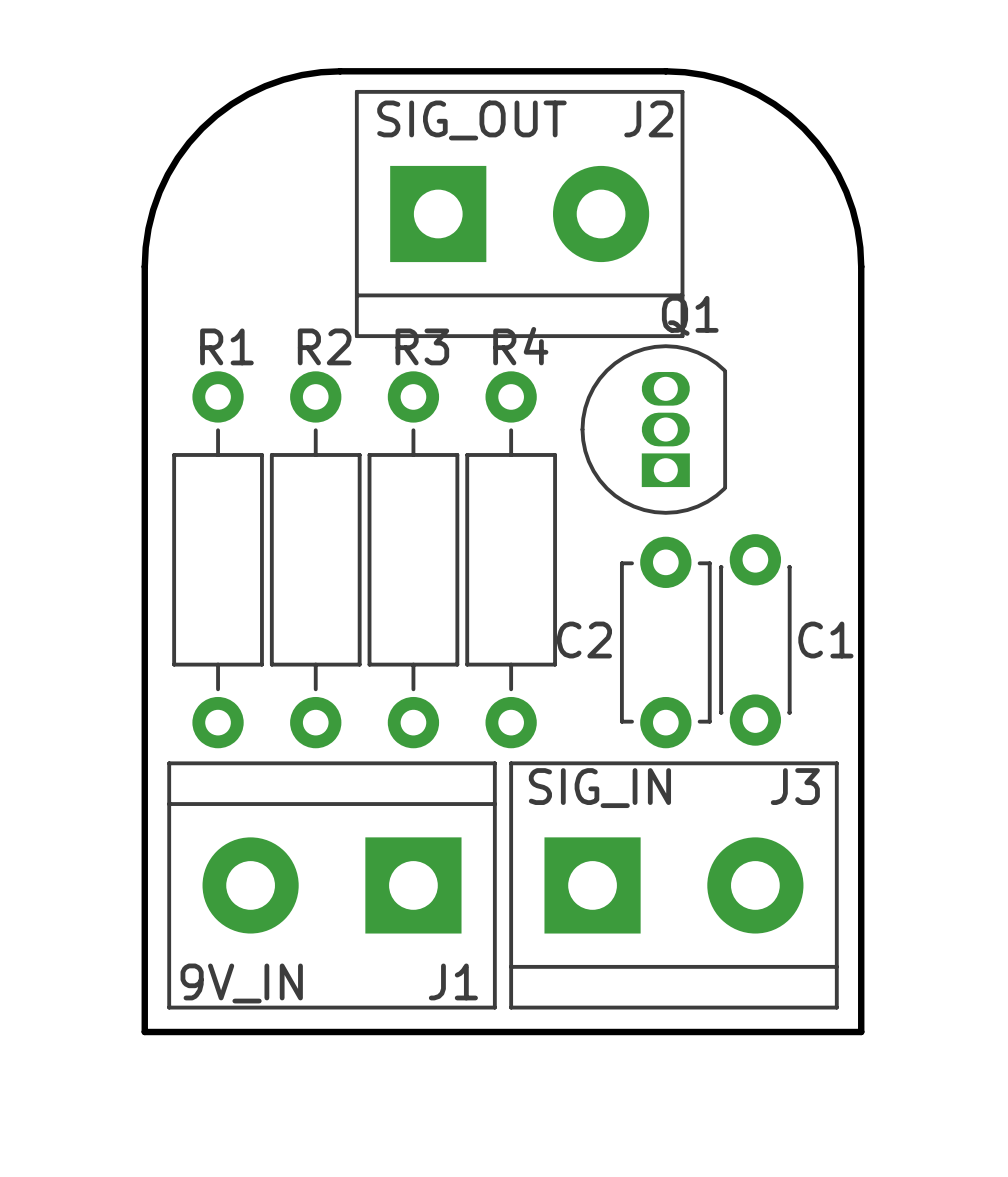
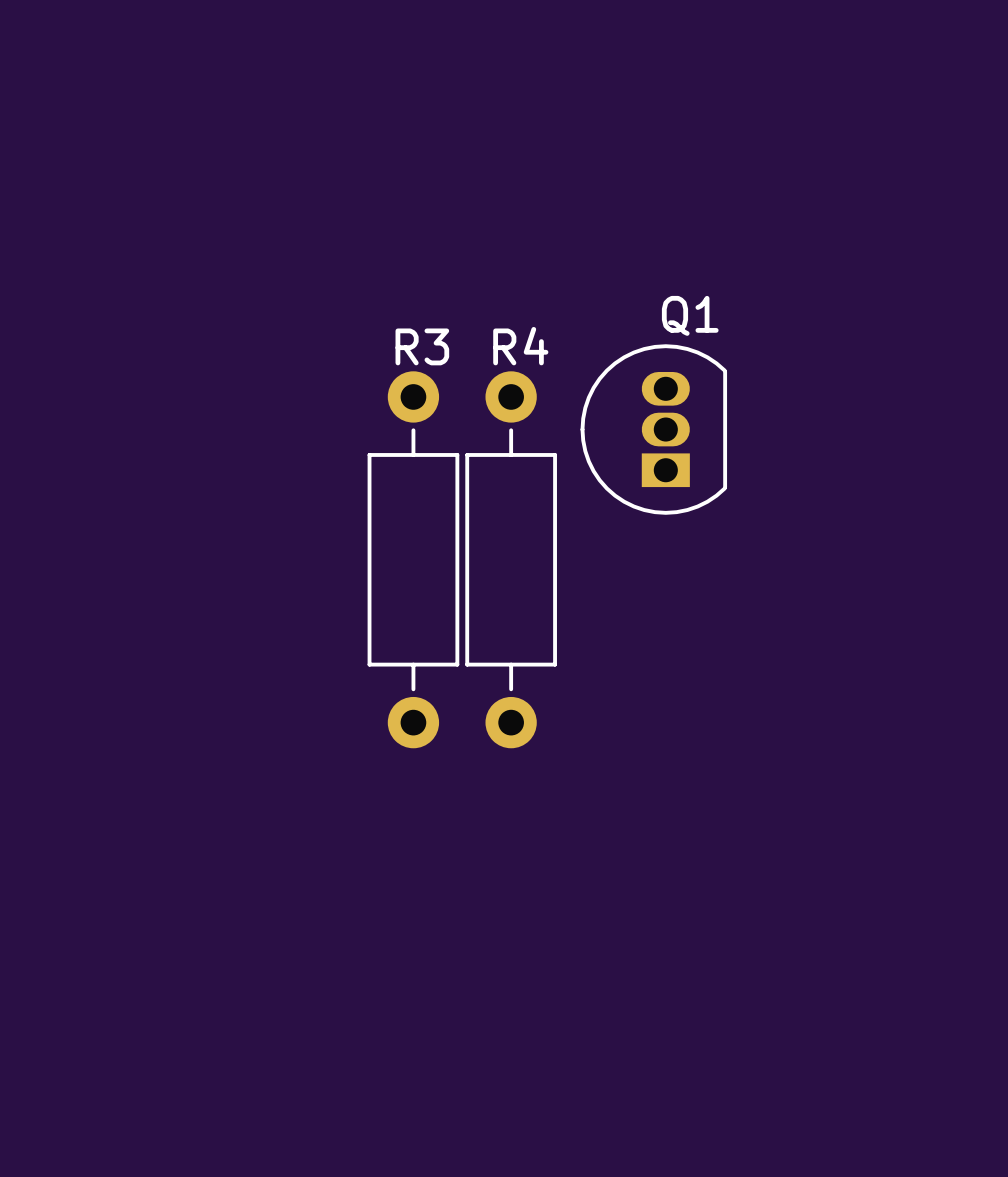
board edge: (340, 71) (665, 71) (703, 75) (740, 86) (774, 104) (803, 128) (816, 142) (838, 174) (852, 209) (857, 228) (861, 266) (861, 1032) (144, 1032) (144, 266) (148, 228) (159, 191) (177, 158) (201, 128) (216, 115) (248, 94) (283, 79) (321, 72) (340, 71) -> none
J2: SIG_OUT (519, 214) -> none
R1: (218, 559) -> none
R2: (315, 559) -> none
C1: (755, 639) -> none
C2: (665, 642) -> none
J1: 9V_IN (332, 885) -> none
J3: SIG_IN (673, 885) -> none

